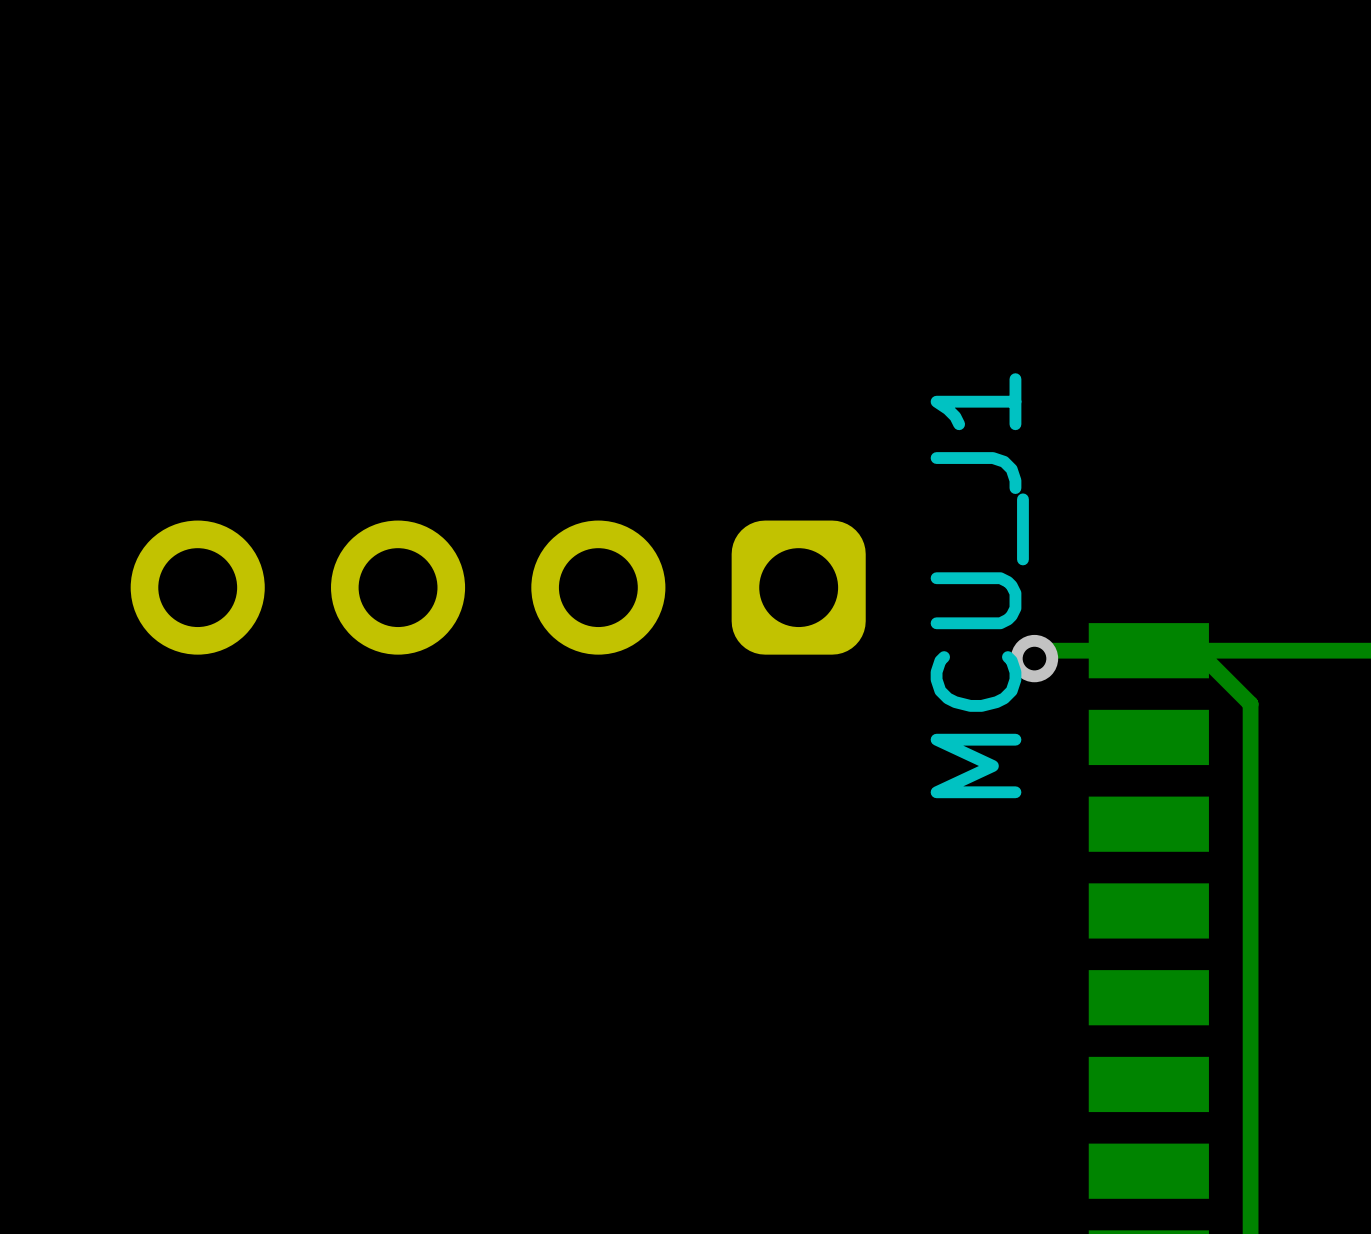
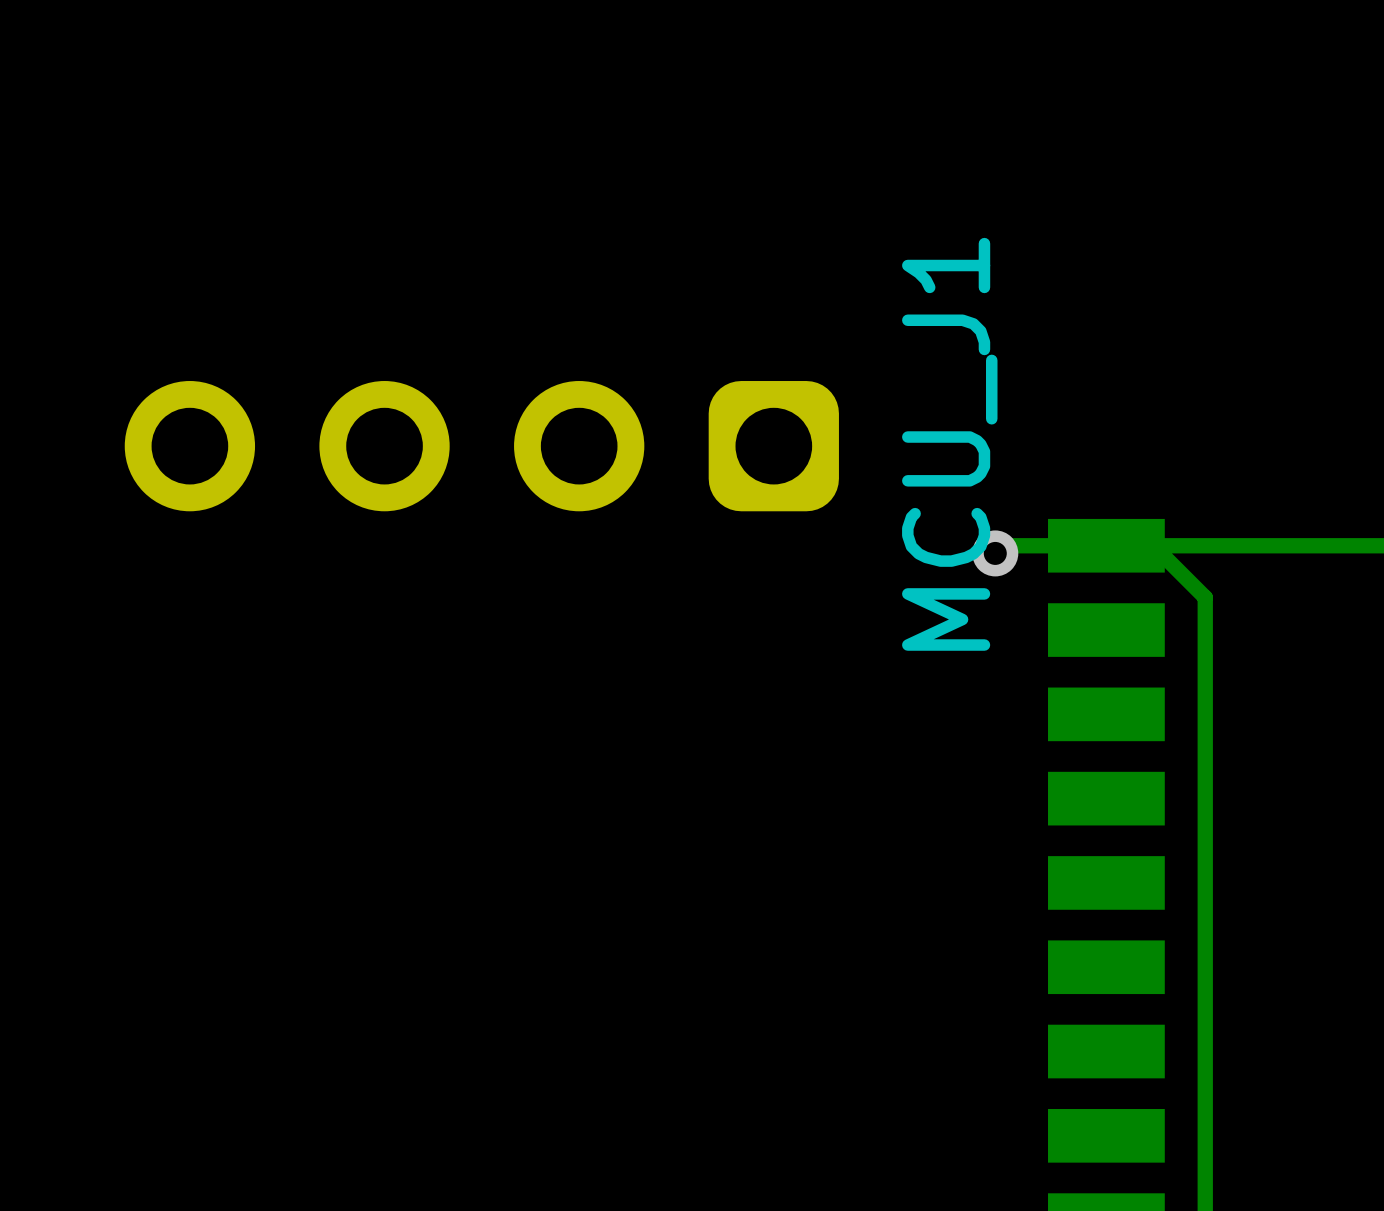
MCU_J1 position: (498, 587) -> (481, 446)

